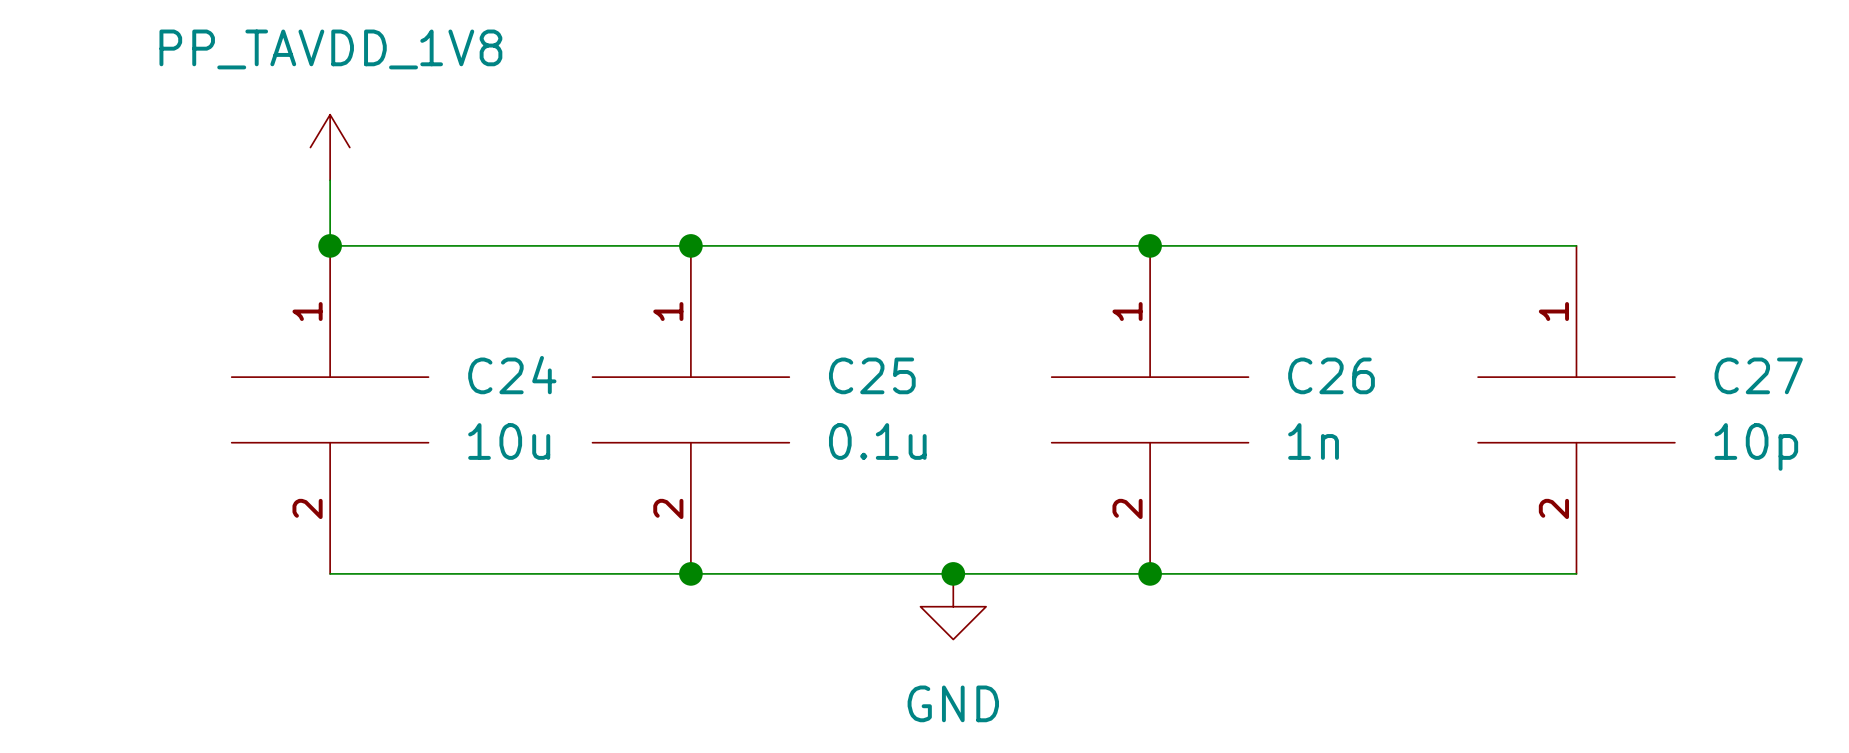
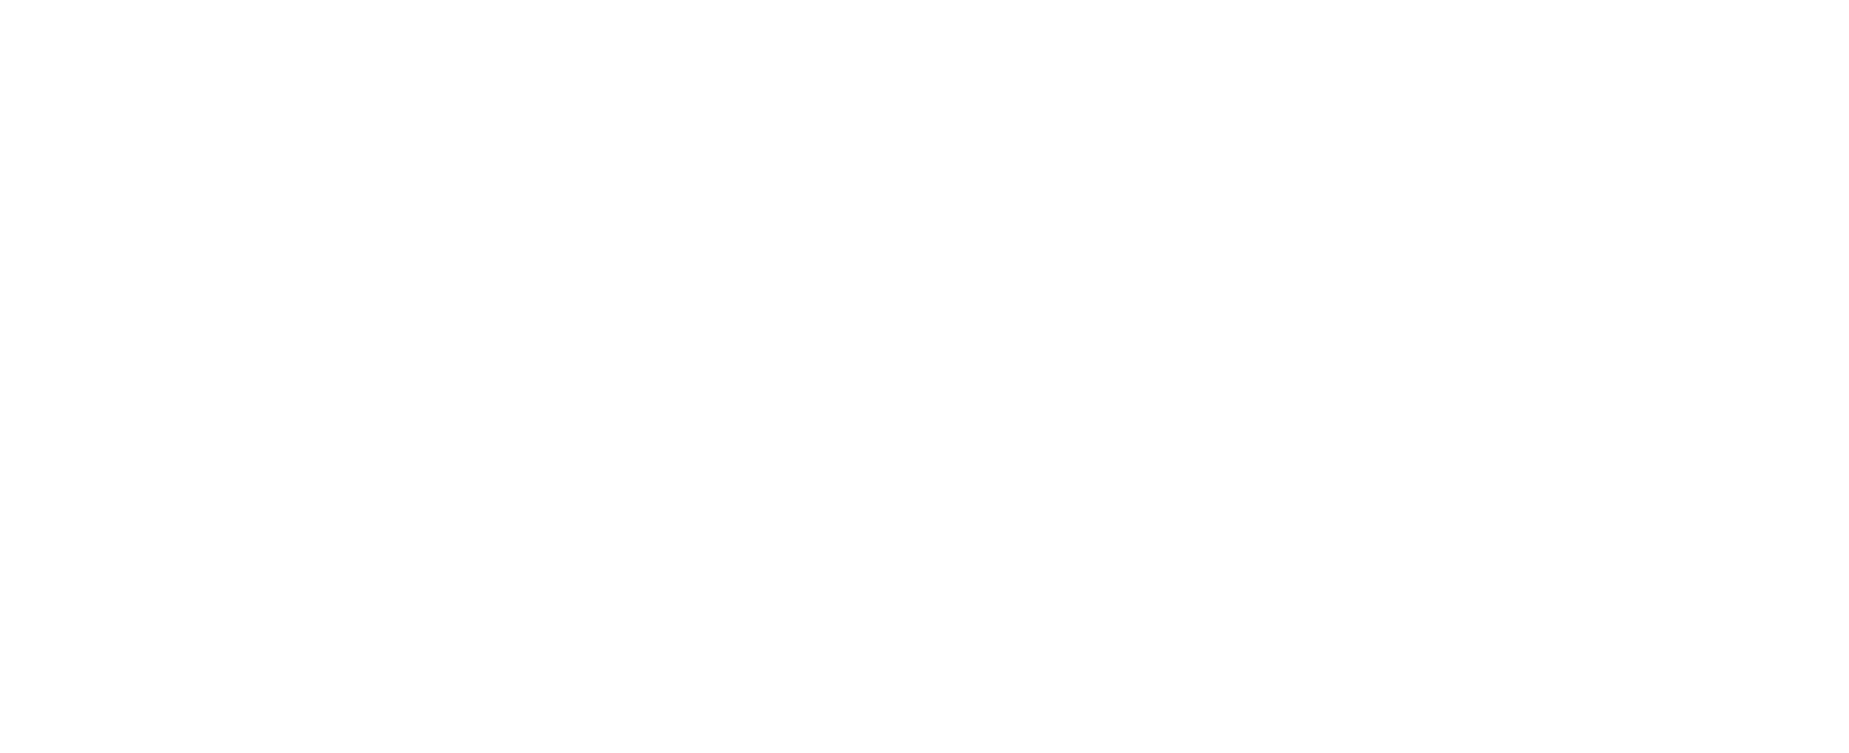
power symbol: PP_TAVDD_1V8 (330, 147) -> none
wire: (330, 180) (330, 245) (1576, 245) -> none
junction: (330, 245) -> none
junction: (690, 245) -> none
junction: (1150, 245) -> none
C24: 10u (330, 409) -> none
C25: 0.1u (690, 409) -> none
C26: 1n (1150, 409) -> none
C27: 10p (1576, 409) -> none
wire: (330, 573) (1576, 573) -> none
junction: (690, 573) -> none
junction: (953, 573) -> none
junction: (1150, 573) -> none
power symbol: GND (953, 606) -> none

